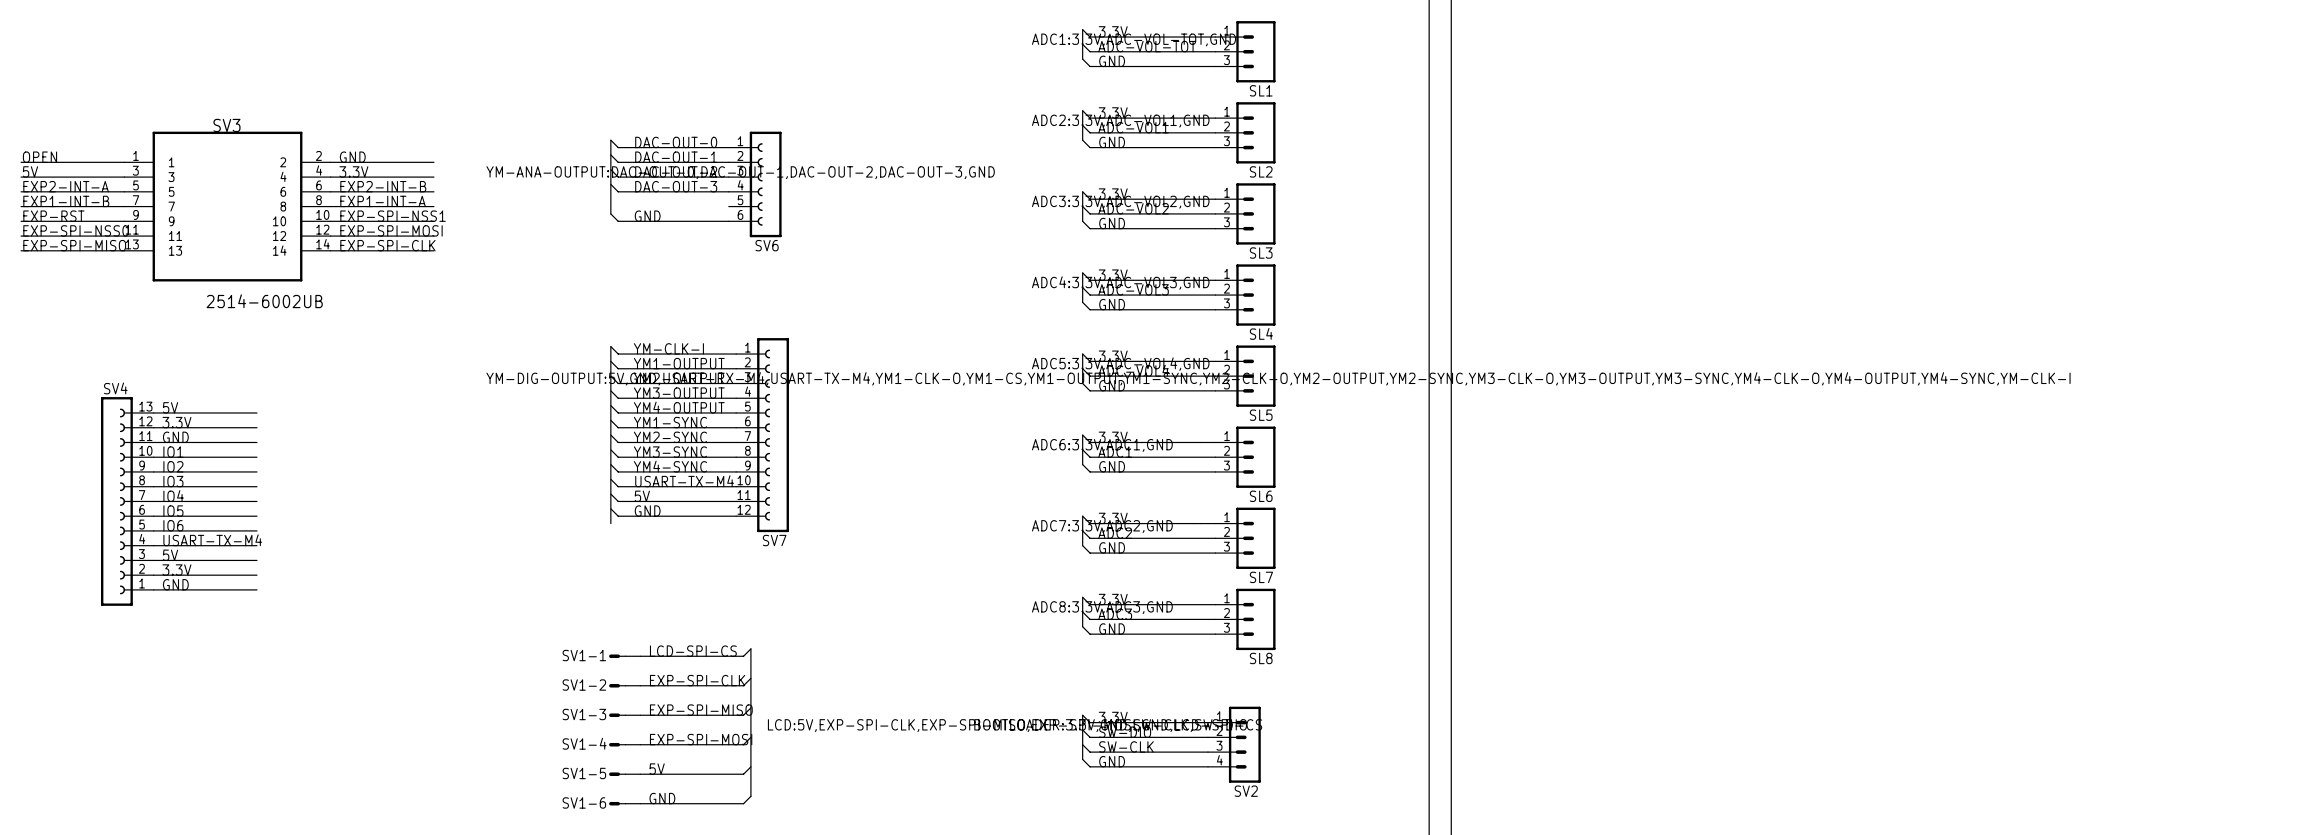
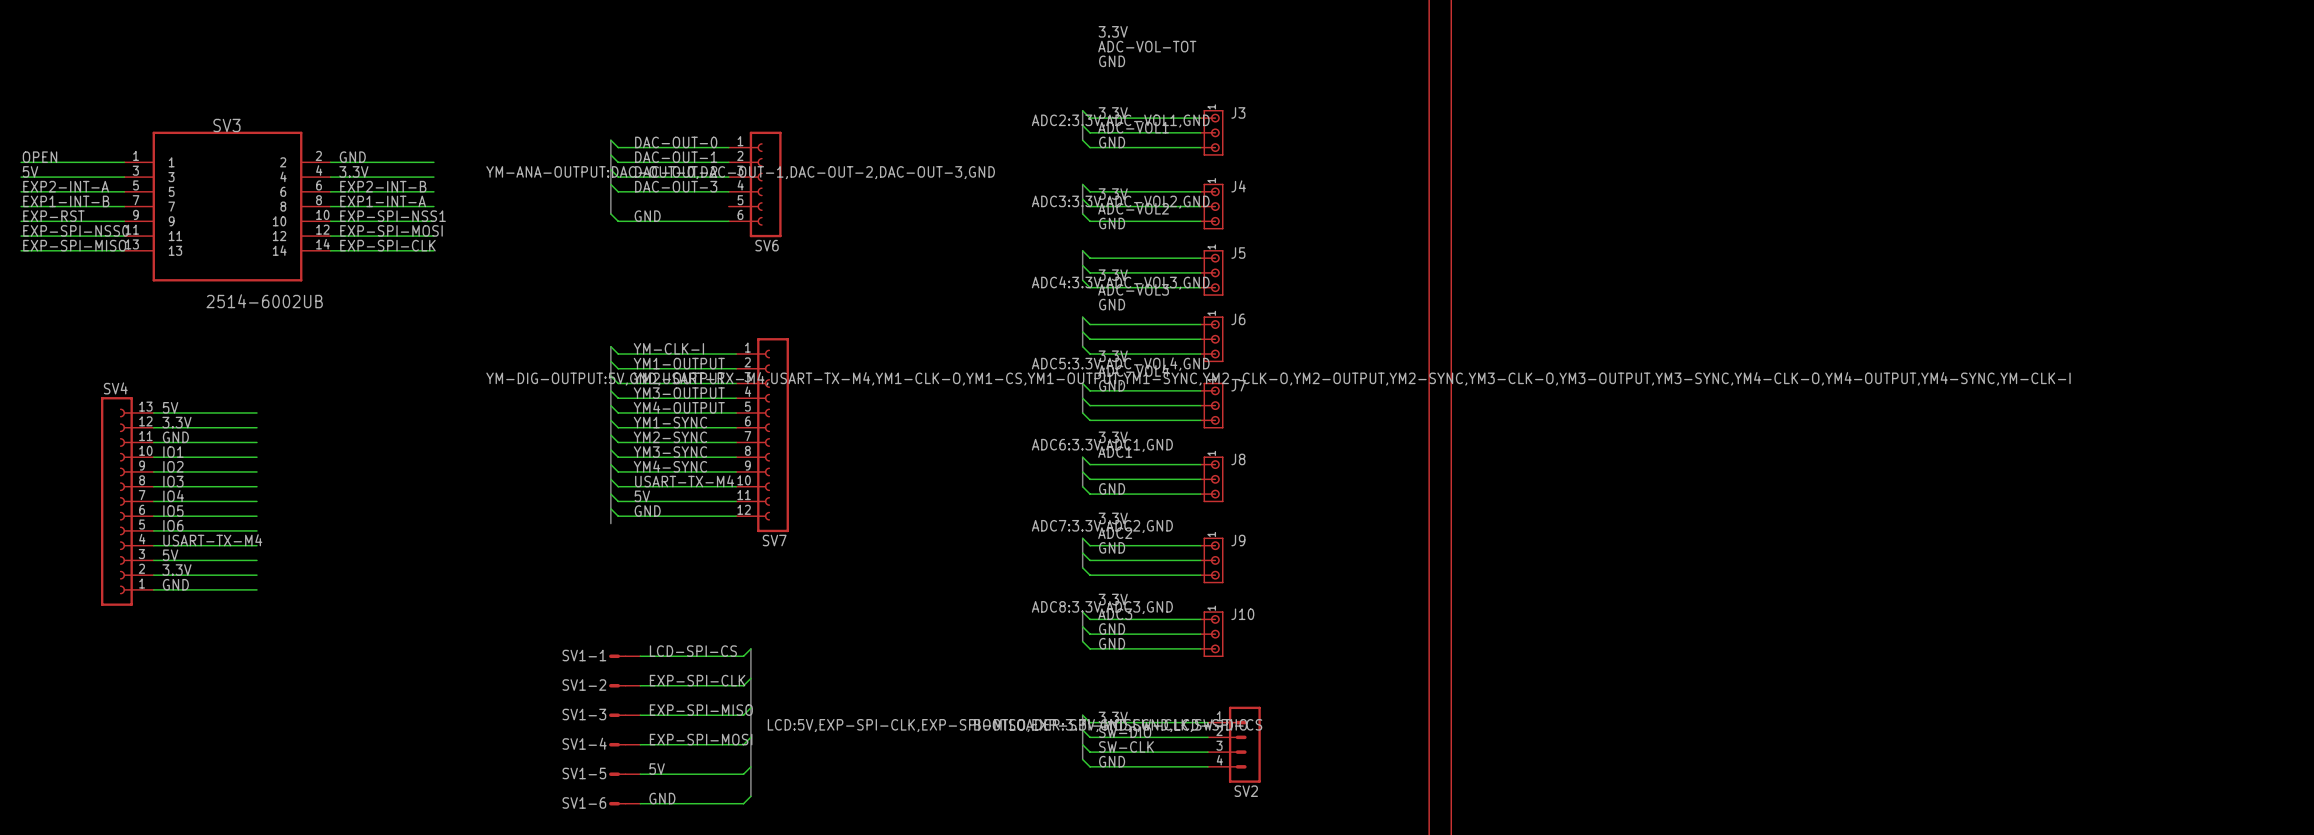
bus: (1082, 29) (1082, 59) -> none
wire: (1082, 29) (1090, 37) (1215, 37) -> none
label: ADC1:3.3V,ADC-VOL-TOT,GND (1134, 39) -> none
wire: (1082, 44) (1090, 51) (1215, 51) -> none
SL1: (1245, 51) -> none
wire: (1082, 59) (1090, 66) (1215, 66) -> none
J3: none -> (1212, 132)
SL2: (1245, 132) -> none
wire: none -> (1082, 184) (1090, 191) (1200, 191)
wire: (1082, 191) (1090, 199) (1215, 199) -> none
wire: none -> (1082, 199) (1090, 206) (1200, 206)
wire: (1082, 206) (1090, 213) (1215, 213) -> none
J4: none -> (1212, 206)
bus: (1082, 213) (1082, 221) -> (1082, 184) (1082, 191)
wire: none -> (1082, 213) (1090, 221) (1200, 221)
SL3: (1245, 213) -> none
wire: (1082, 221) (1090, 228) (1215, 228) -> none
wire: none -> (1082, 250) (1090, 258) (1200, 258)
wire: none -> (1082, 265) (1090, 272) (1200, 272)
wire: (1082, 272) (1090, 280) (1215, 280) -> none
J5: none -> (1212, 272)
bus: (1082, 280) (1082, 302) -> (1082, 250) (1082, 272)
wire: none -> (1082, 280) (1090, 287) (1200, 287)
wire: (1082, 287) (1090, 295) (1215, 295) -> none
SL4: (1245, 295) -> none
wire: (1082, 302) (1090, 309) (1215, 309) -> none
bus: none -> (1082, 317) (1082, 346)
wire: none -> (1082, 317) (1090, 324) (1200, 324)
wire: none -> (1082, 331) (1090, 339) (1200, 339)
J6: none -> (1212, 339)
wire: none -> (1082, 346) (1090, 354) (1200, 354)
bus: (1082, 354) (1082, 383) -> (1082, 412) (1082, 383)
wire: (1082, 354) (1090, 361) (1215, 361) -> none
wire: (1082, 368) (1090, 376) (1215, 376) -> none
SL5: (1245, 376) -> none
wire: none -> (1082, 398) (1090, 405) (1200, 405)
J7: none -> (1212, 405)
wire: none -> (1082, 412) (1090, 420) (1200, 420)
bus: (1082, 435) (1082, 457) -> (1082, 464) (1082, 486)
wire: (1082, 435) (1090, 442) (1215, 442) -> none
wire: (1082, 449) (1090, 457) (1215, 457) -> none
wire: none -> (1082, 457) (1090, 464) (1200, 464)
SL6: (1245, 457) -> none
wire: (1082, 464) (1090, 471) (1215, 471) -> none
label position: GND (1112, 466) -> GND (1112, 488)
wire: none -> (1082, 471) (1090, 479) (1200, 479)
J8: none -> (1212, 479)
wire: none -> (1082, 486) (1090, 494) (1200, 494)
bus: (1082, 516) (1082, 538) -> (1082, 545) (1082, 567)
wire: (1082, 516) (1090, 523) (1215, 523) -> none
wire: (1082, 530) (1090, 538) (1215, 538) -> none
wire: none -> (1082, 538) (1090, 545) (1200, 545)
SL7: (1245, 538) -> none
wire: (1082, 545) (1090, 553) (1215, 553) -> none
wire: none -> (1082, 553) (1090, 560) (1200, 560)
J9: none -> (1212, 560)
wire: none -> (1082, 567) (1090, 575) (1200, 575)
bus: (1082, 597) (1082, 612) -> (1082, 626) (1082, 641)
wire: (1082, 597) (1090, 604) (1215, 604) -> none
SL8: (1245, 619) -> none
J10: none -> (1212, 634)
wire: none -> (1082, 641) (1090, 648) (1200, 648)
label: none -> GND (1112, 643)

